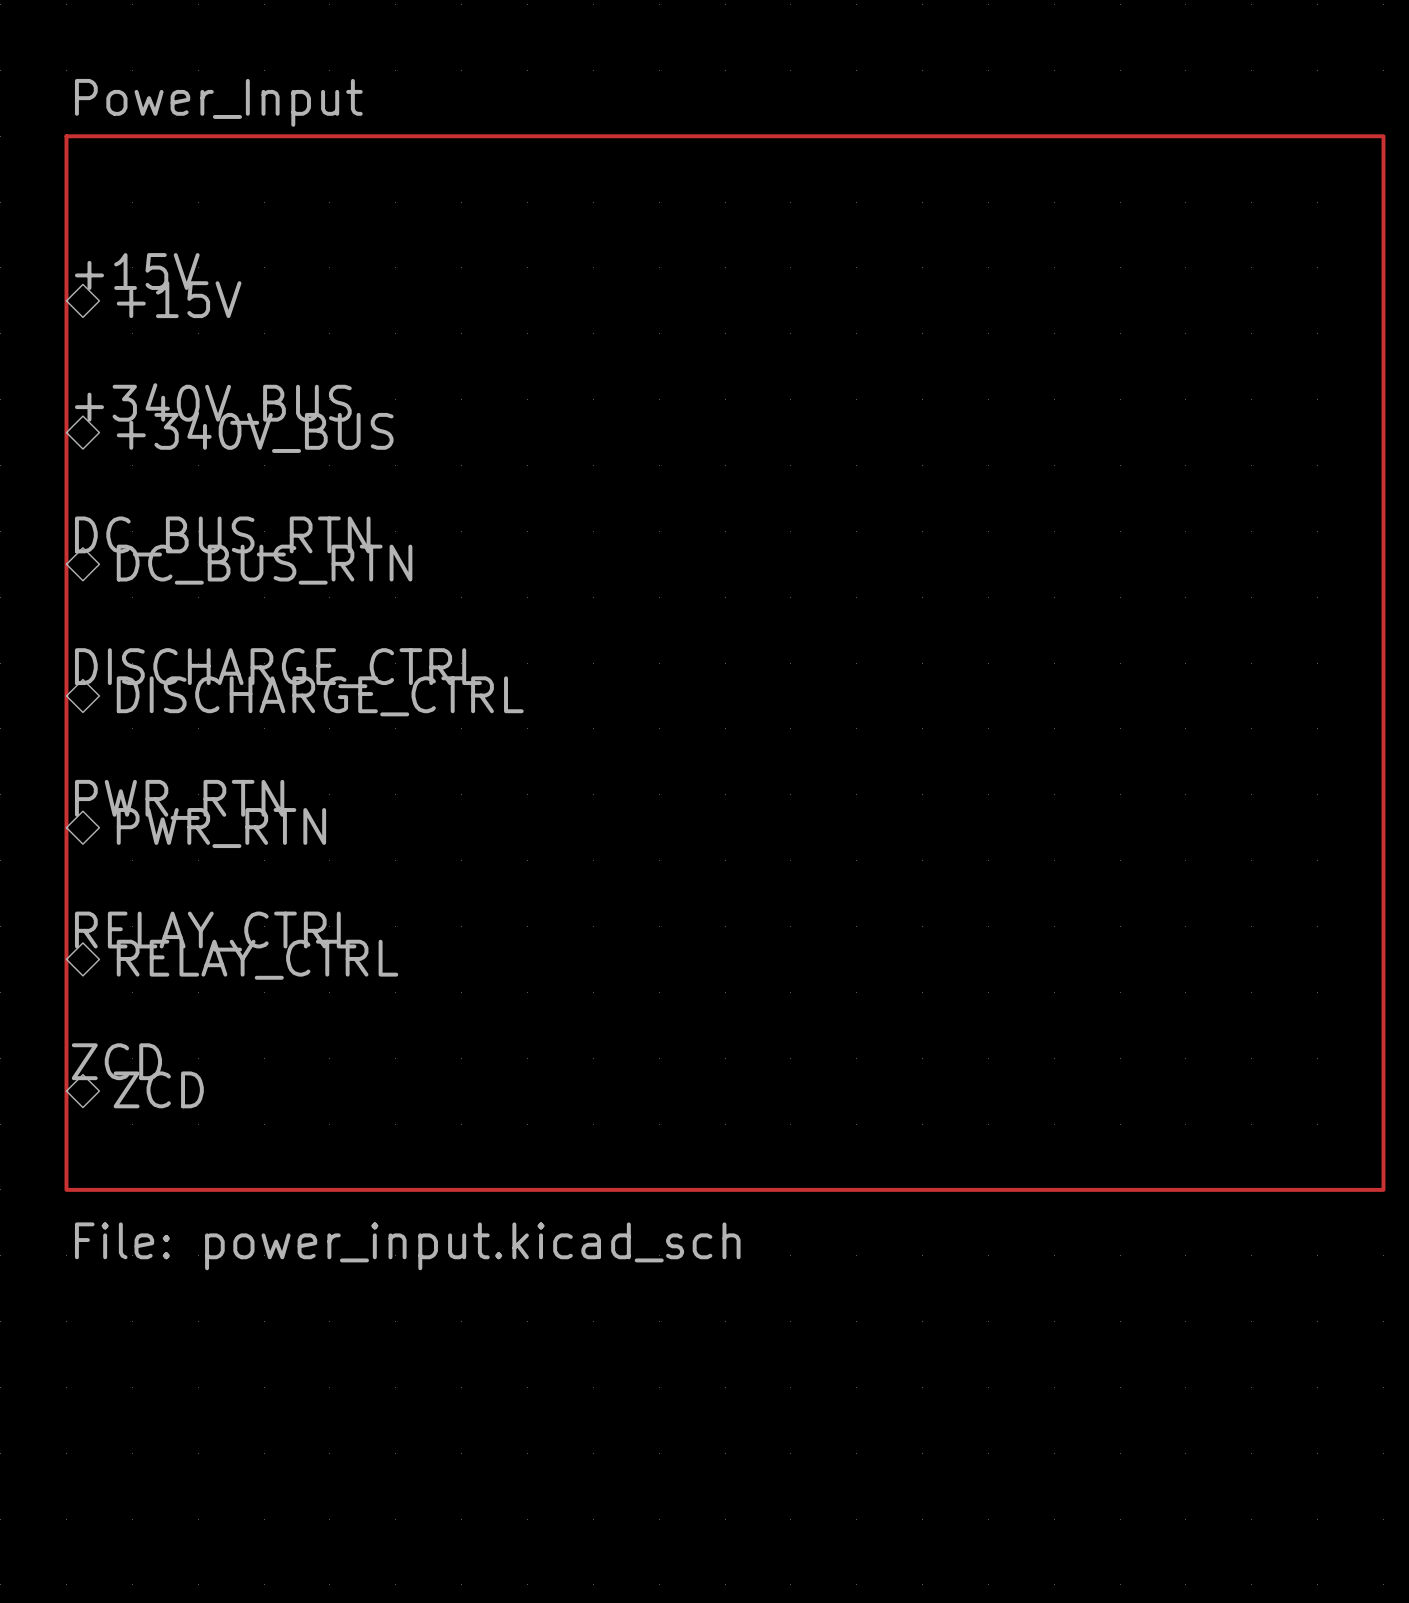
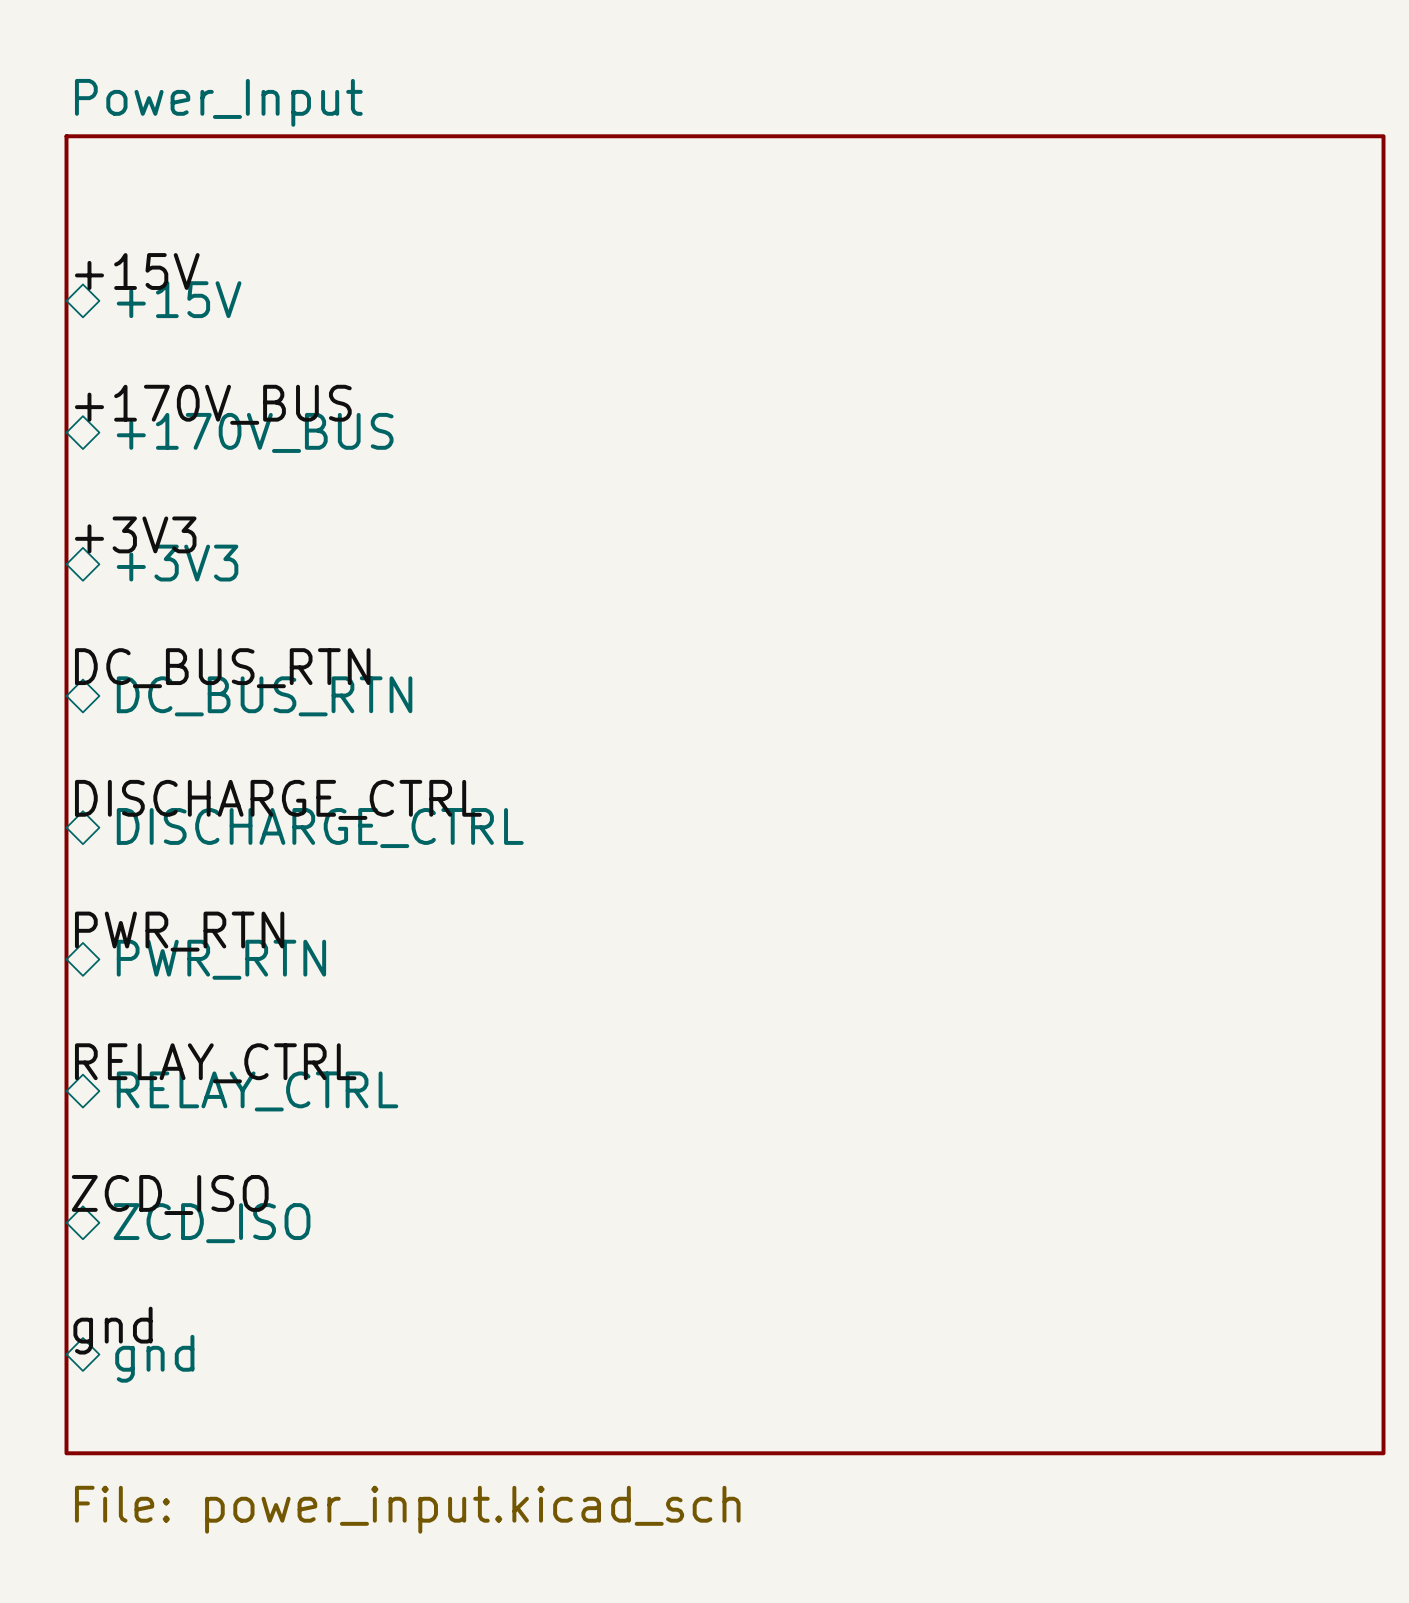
label: +340V_BUS (213, 403) -> +170V_BUS (213, 404)
sheet pin: +340V_BUS (255, 432) -> +170V_BUS (255, 432)
label: DC_BUS_RTN (222, 536) -> +3V3 (135, 534)
sheet pin: DC_BUS_RTN (264, 564) -> +3V3 (177, 563)
sheet Power_Input: File: power_input.kicad_sch (725, 663) -> none
label: DISCHARGE_CTRL (278, 668) -> DC_BUS_RTN (222, 668)
sheet pin: DISCHARGE_CTRL (320, 696) -> DC_BUS_RTN (264, 696)
sheet Power_Input: none -> File: power_input.kicad_sch (725, 794)
label: PWR_RTN (179, 799) -> DISCHARGE_CTRL (278, 799)
sheet pin: PWR_RTN (221, 828) -> DISCHARGE_CTRL (320, 828)
label: RELAY_CTRL (215, 931) -> PWR_RTN (179, 931)
sheet pin: RELAY_CTRL (257, 959) -> PWR_RTN (221, 959)
label: ZCD (116, 1061) -> RELAY_CTRL (215, 1063)
sheet pin: ZCD (158, 1089) -> RELAY_CTRL (257, 1091)
label: none -> ZCD_ISO (170, 1194)
sheet pin: none -> ZCD_ISO (212, 1223)
label: none -> gnd (112, 1330)
sheet pin: none -> gnd (154, 1358)

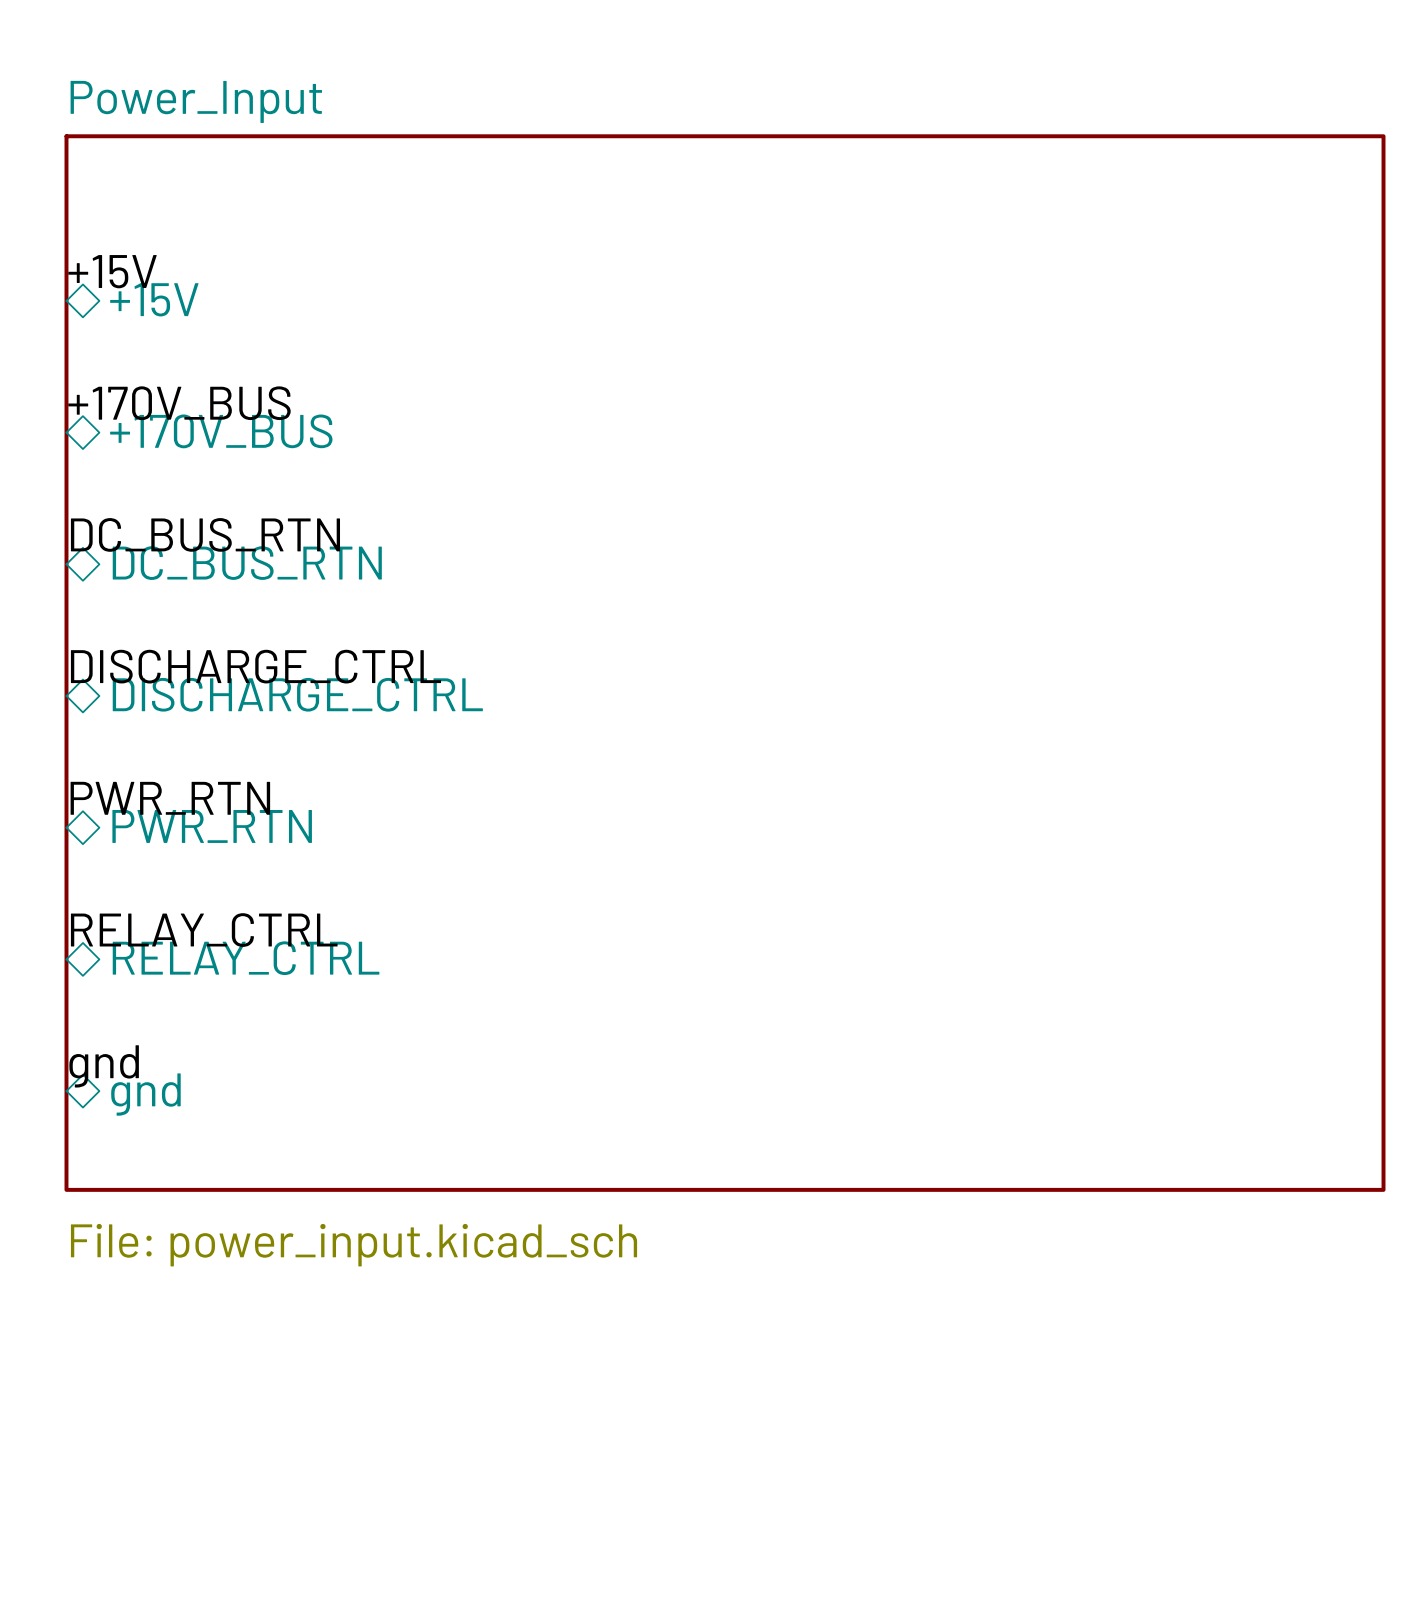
label: +3V3 (135, 534) -> DC_BUS_RTN (205, 534)
sheet pin: +3V3 (177, 563) -> DC_BUS_RTN (247, 563)
sheet Power_Input: none -> File: power_input.kicad_sch (725, 663)
label: DC_BUS_RTN (222, 668) -> DISCHARGE_CTRL (255, 666)
sheet pin: DC_BUS_RTN (264, 696) -> DISCHARGE_CTRL (297, 694)
sheet Power_Input: File: power_input.kicad_sch (725, 794) -> none
label: DISCHARGE_CTRL (278, 799) -> PWR_RTN (170, 798)
sheet pin: DISCHARGE_CTRL (320, 828) -> PWR_RTN (212, 826)
label: PWR_RTN (179, 931) -> RELAY_CTRL (204, 930)
sheet pin: PWR_RTN (221, 959) -> RELAY_CTRL (246, 958)
label: RELAY_CTRL (215, 1063) -> gnd (104, 1066)
sheet pin: RELAY_CTRL (257, 1091) -> gnd (145, 1094)
label: ZCD_ISO (170, 1194) -> none
sheet pin: ZCD_ISO (212, 1223) -> none
label: gnd (112, 1330) -> none
sheet pin: gnd (154, 1358) -> none

